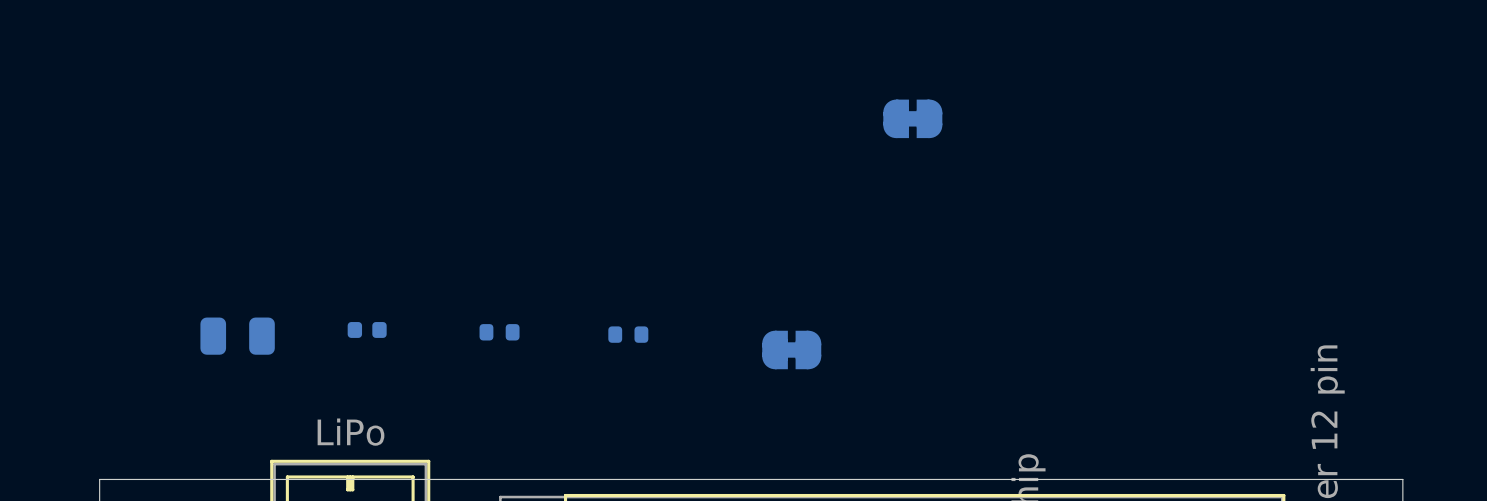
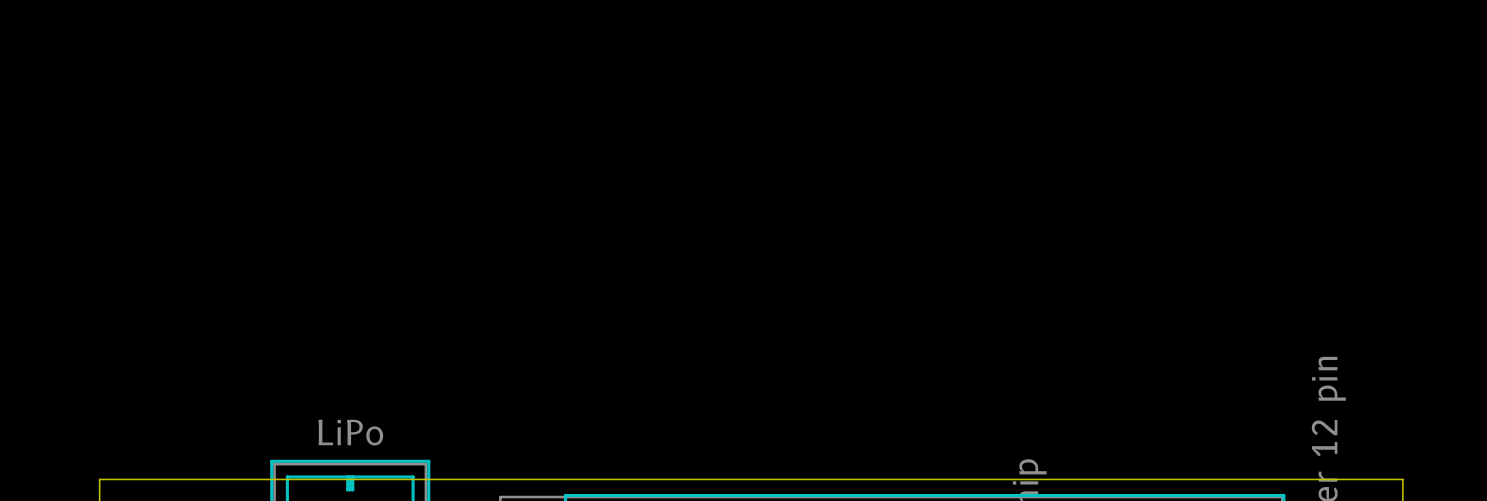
part: (912, 118) -> none
part: (367, 329) -> none
part: (499, 332) -> none
part: (628, 334) -> none
part: (237, 336) -> none
part: (791, 349) -> none

